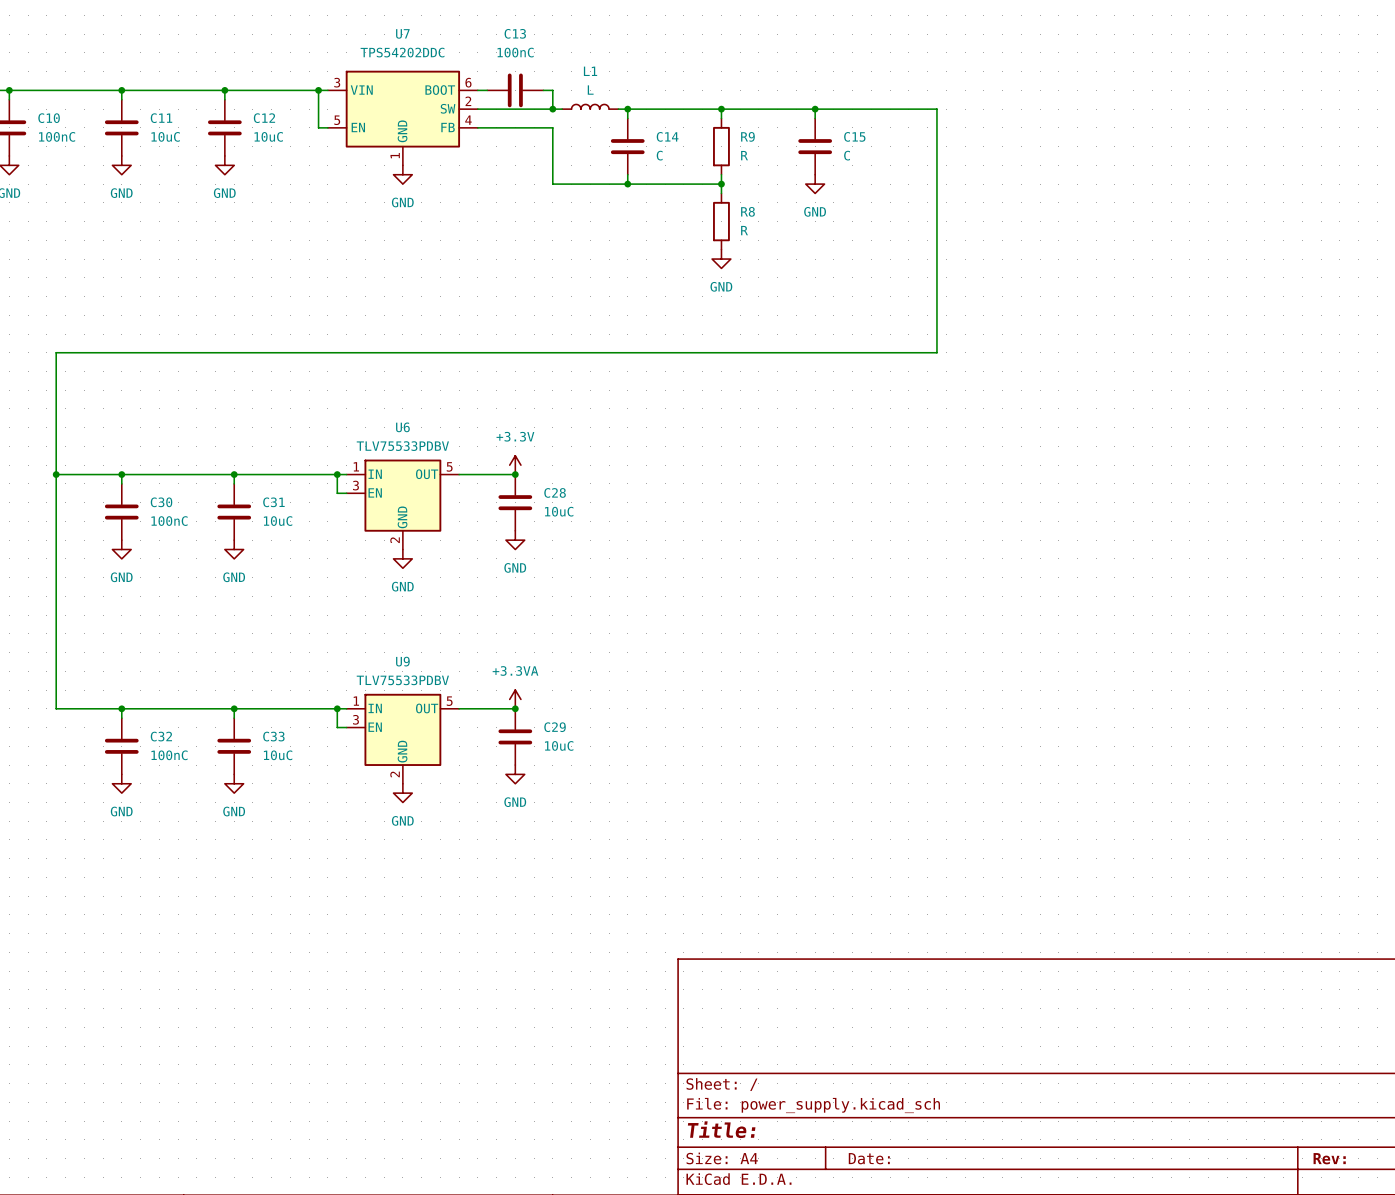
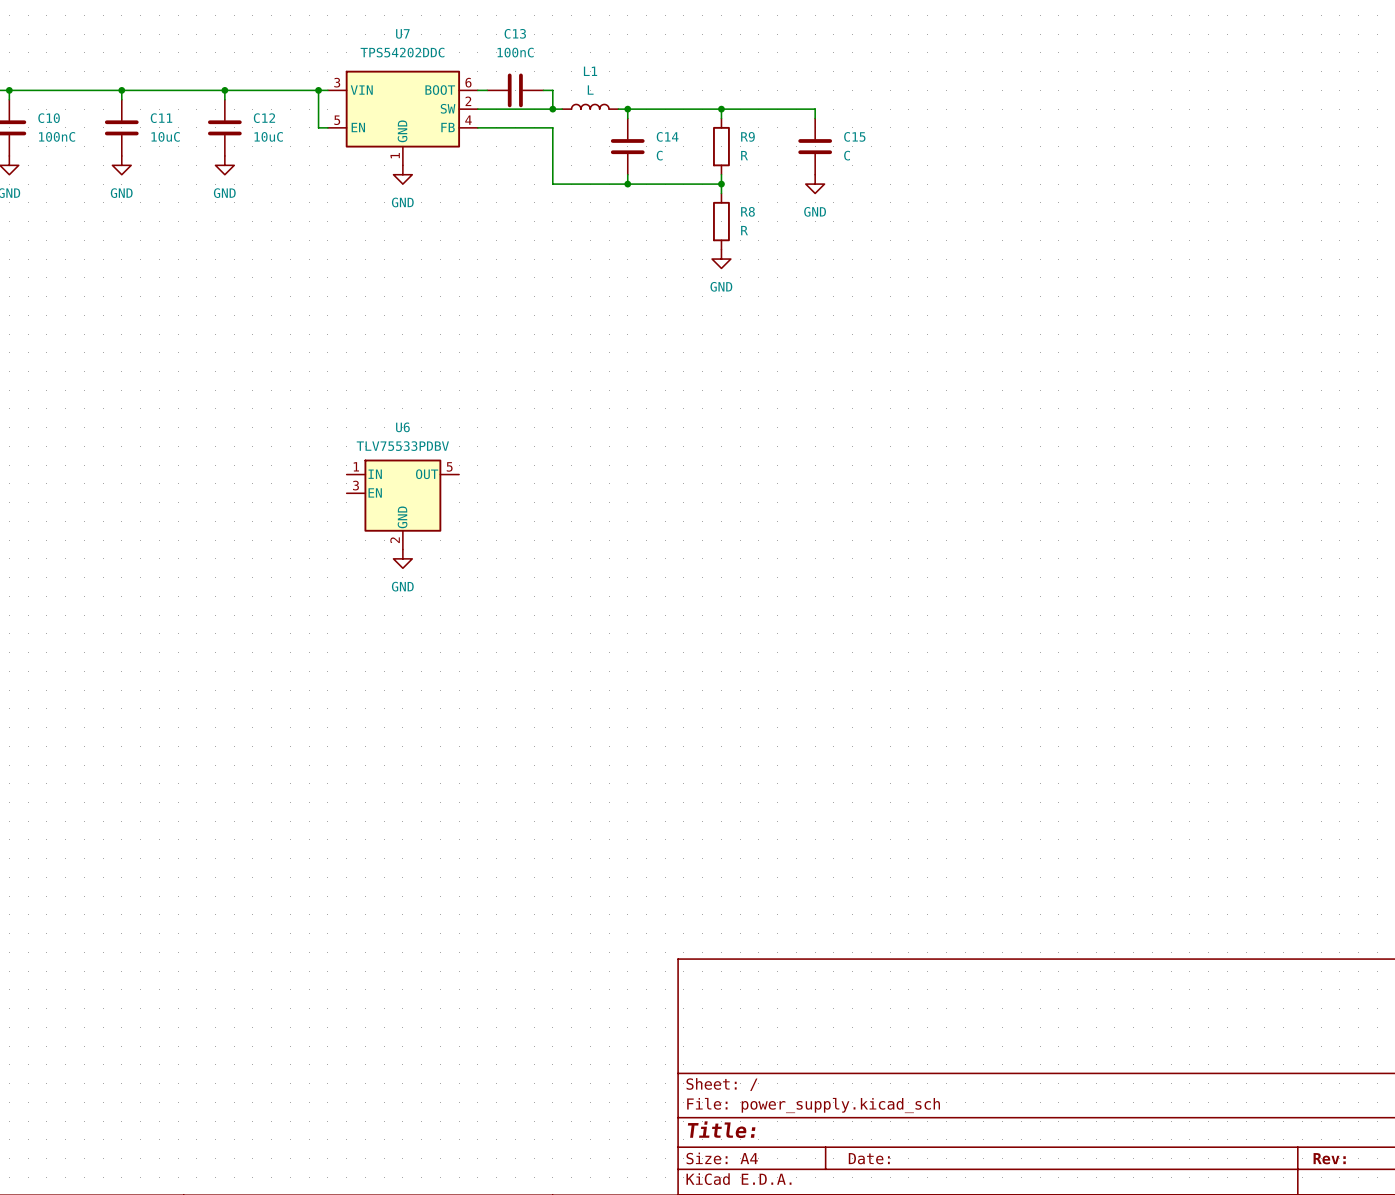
wire: (815, 109) (936, 109) (936, 352) (56, 352) (56, 708) (346, 708) -> none
junction: (815, 109) -> none
power symbol: +3.3V (515, 465) -> none
wire: (56, 474) (346, 474) -> none
junction: (56, 474) -> none
wire: (121, 474) (121, 483) -> none
junction: (121, 474) -> none
wire: (234, 474) (234, 483) -> none
junction: (234, 474) -> none
wire: (337, 474) (337, 493) (346, 493) -> none
junction: (337, 474) -> none
wire: (459, 474) (515, 474) -> none
junction: (515, 474) -> none
C28: 10uC (515, 502) -> none
C30: 100nC (121, 512) -> none
C31: 10uC (234, 512) -> none
power symbol: GND (515, 540) -> none
power symbol: GND (121, 549) -> none
power symbol: GND (234, 549) -> none
power symbol: +3.3VA (515, 699) -> none
wire: (121, 708) (121, 718) -> none
junction: (121, 708) -> none
wire: (234, 708) (234, 718) -> none
junction: (234, 708) -> none
wire: (337, 708) (337, 727) (346, 727) -> none
junction: (337, 708) -> none
wire: (459, 708) (515, 708) -> none
junction: (515, 708) -> none
C29: 10uC (515, 736) -> none
U9: TLV75533PDBV (402, 738) -> none
C32: 100nC (121, 746) -> none
C33: 10uC (234, 746) -> none
power symbol: GND (515, 774) -> none
power symbol: GND (121, 783) -> none
power symbol: GND (234, 783) -> none
power symbol: GND (402, 793) -> none

